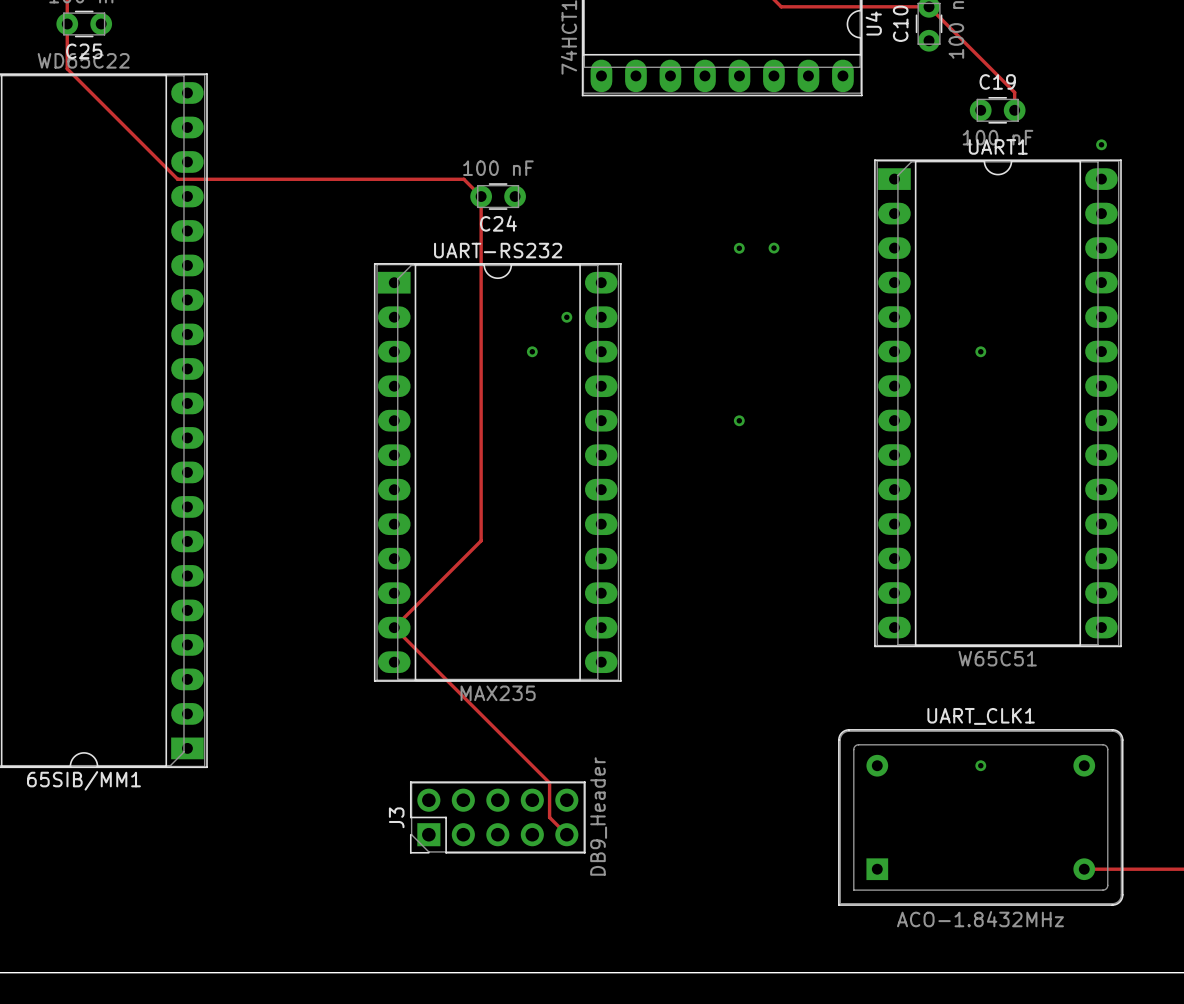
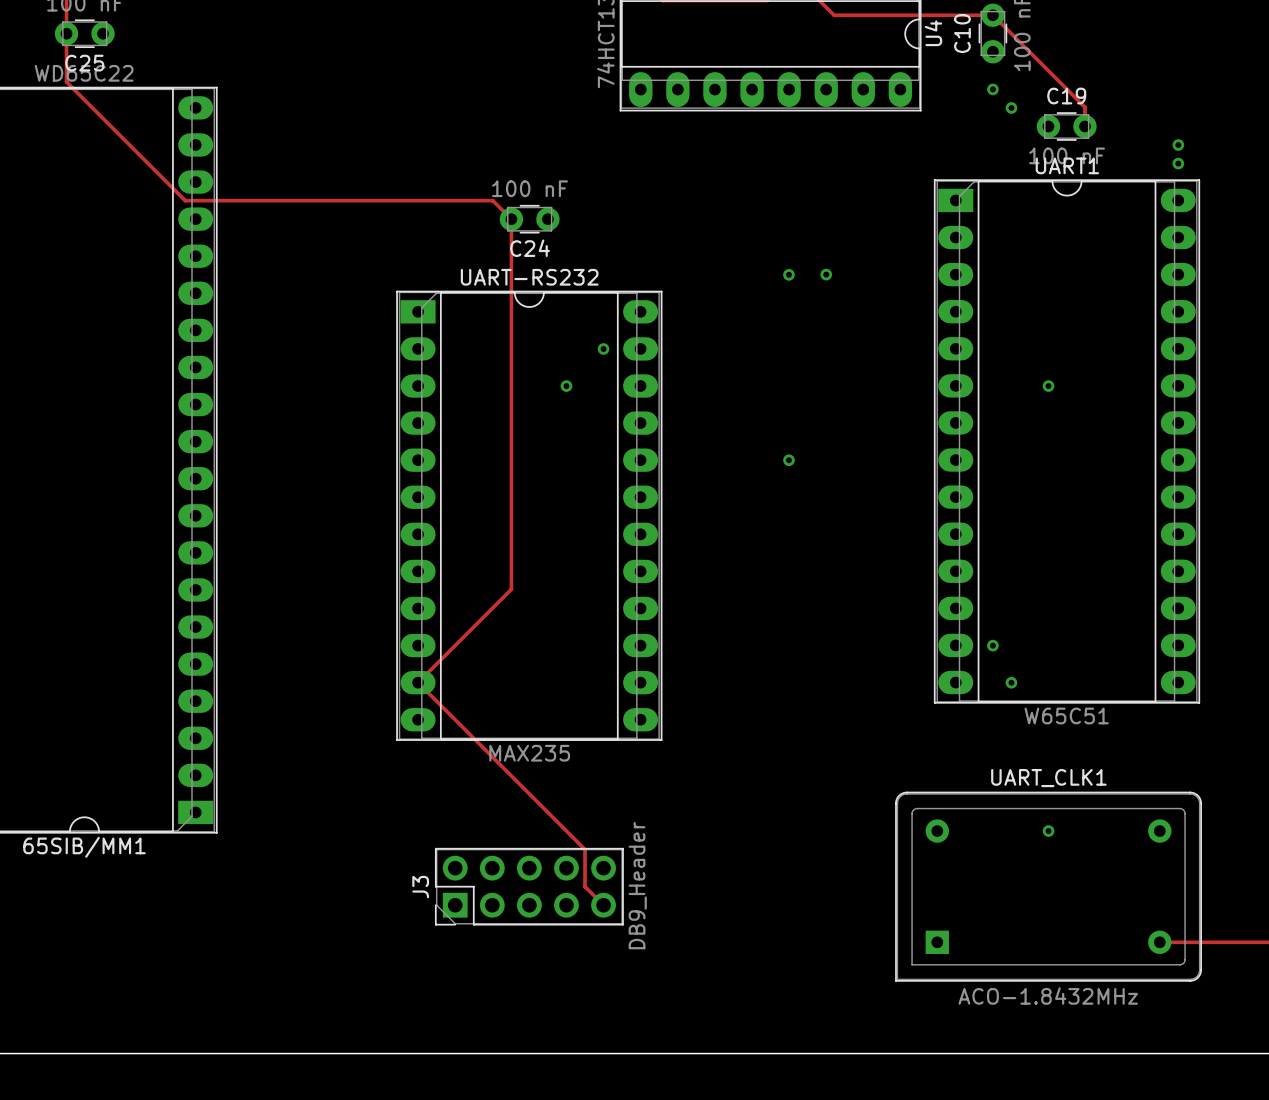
via: none -> (992, 89)
via: none -> (1011, 107)
via: none -> (1178, 145)
via: none -> (992, 645)
via: none -> (1011, 682)

